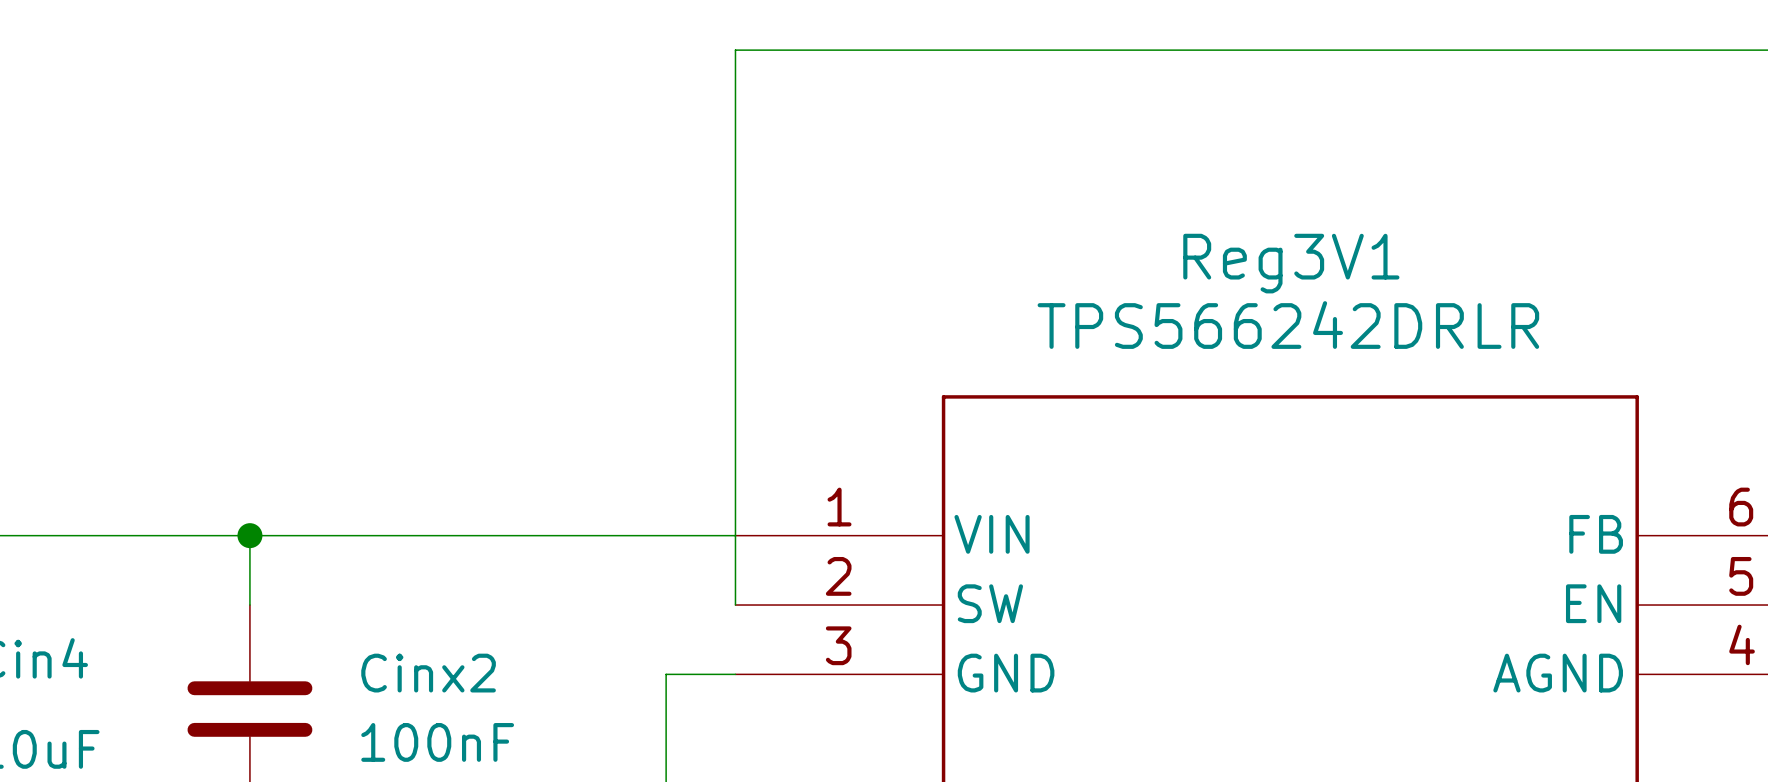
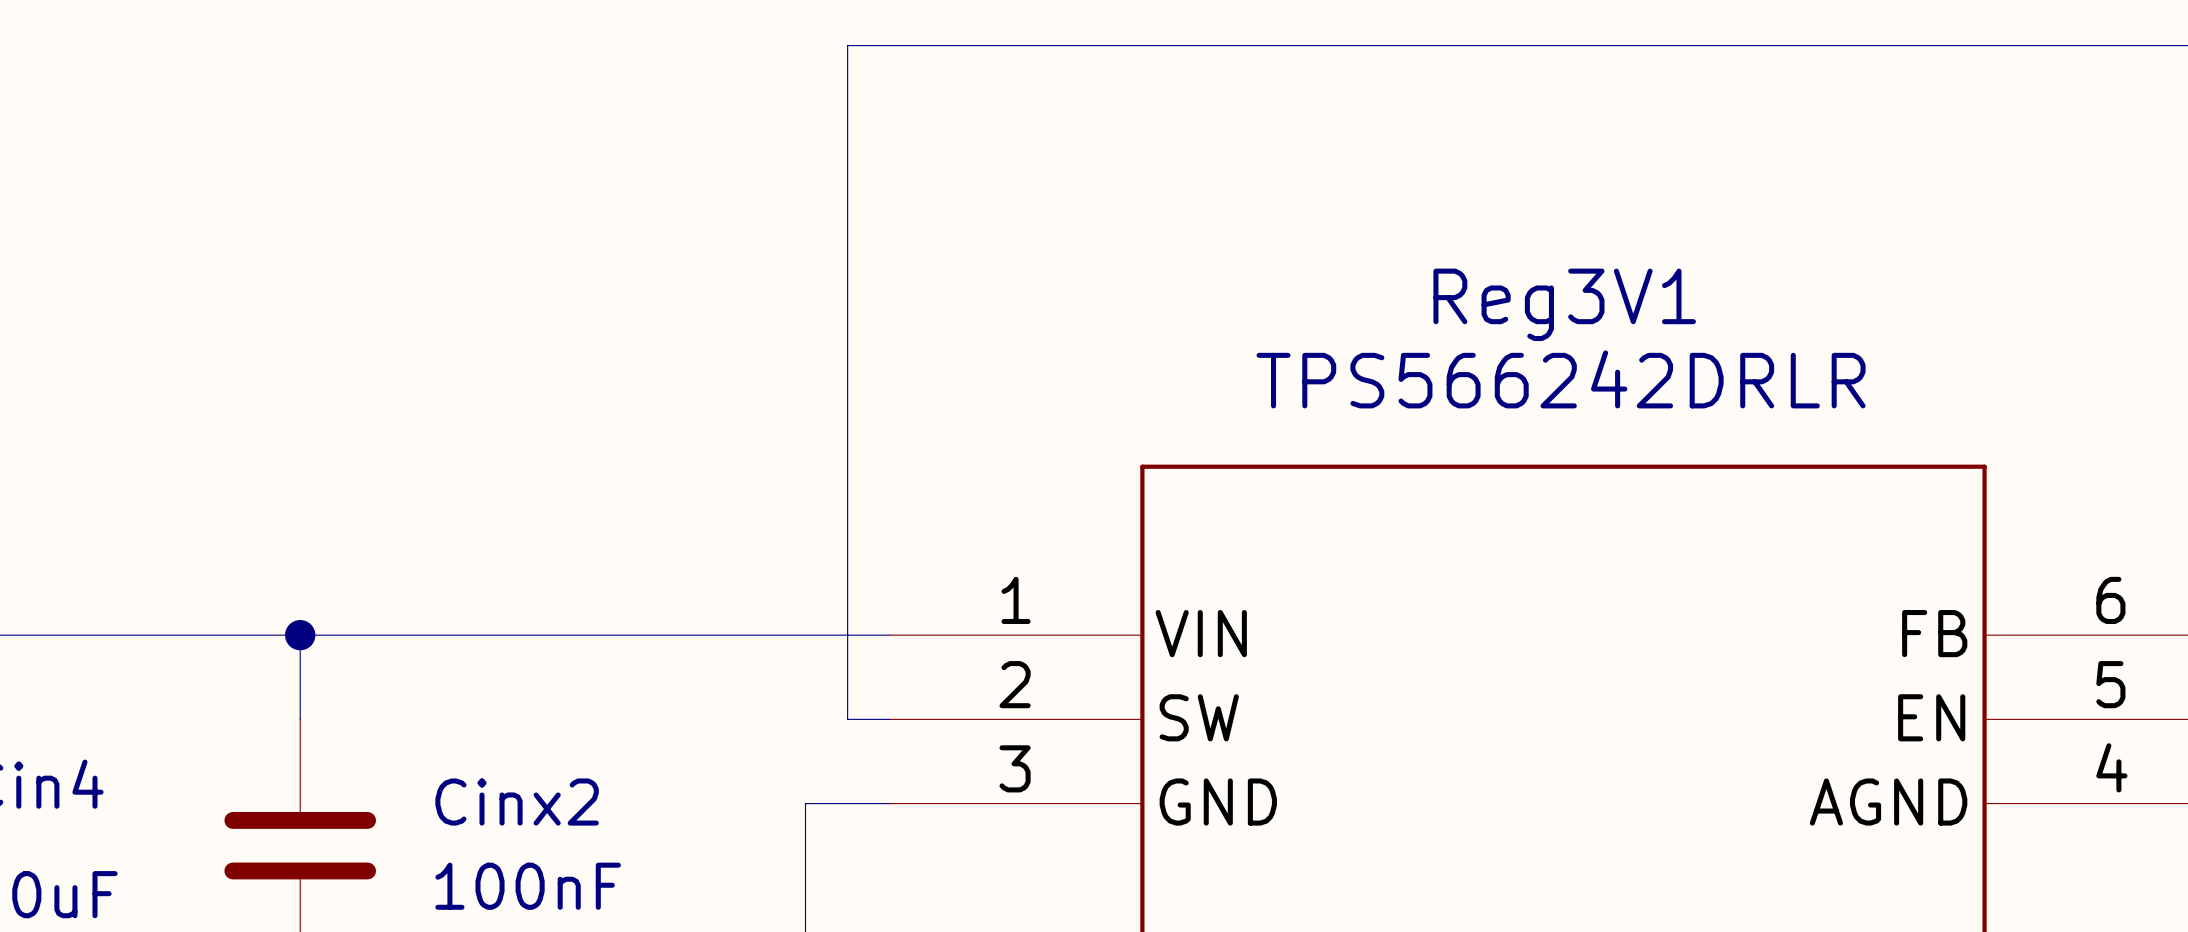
wire: (735, 50) (735, 605) -> (889, 45) (847, 45) (847, 719) (889, 719)

